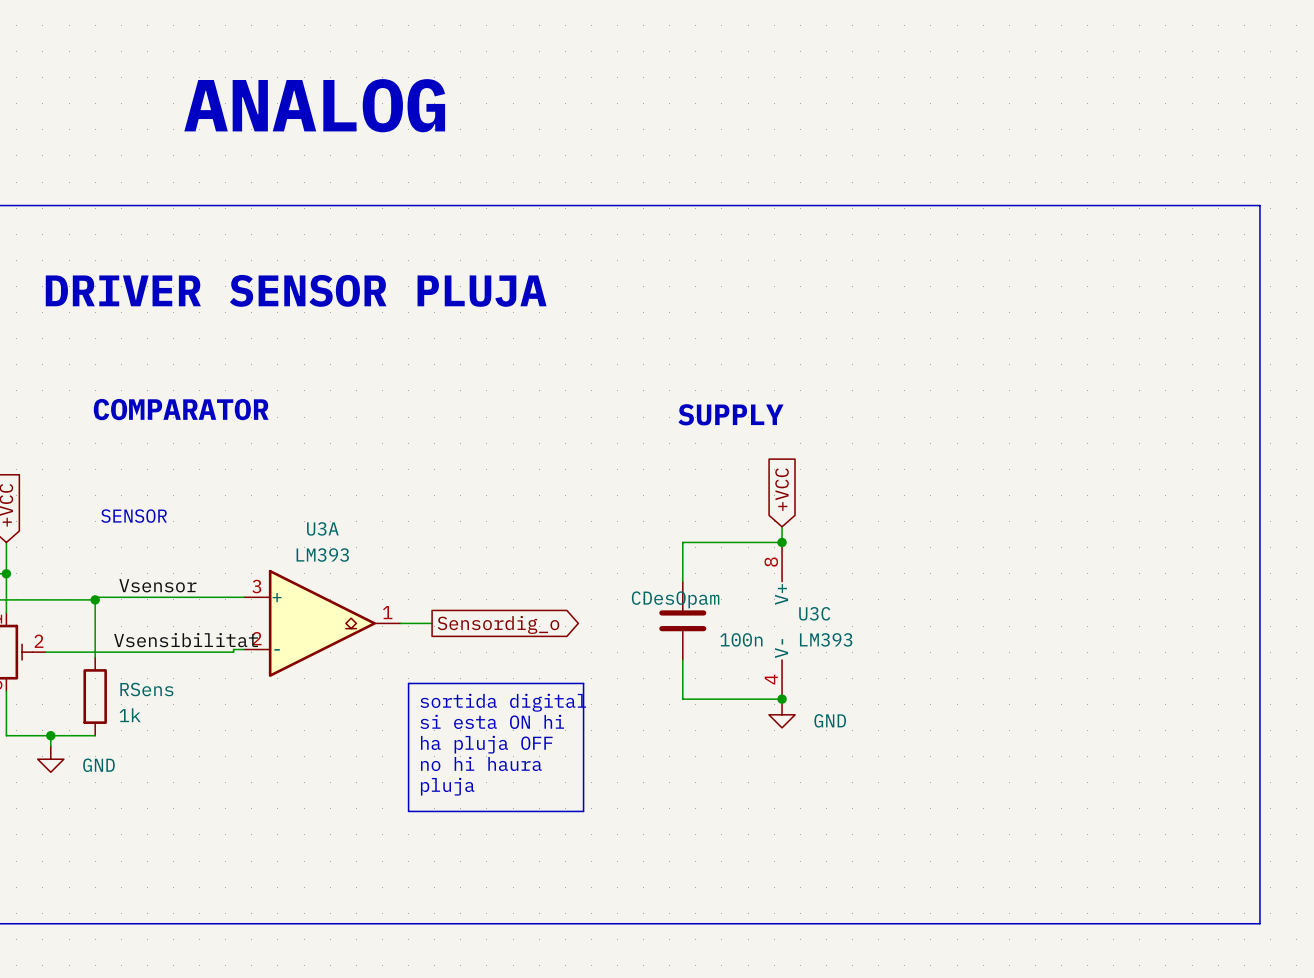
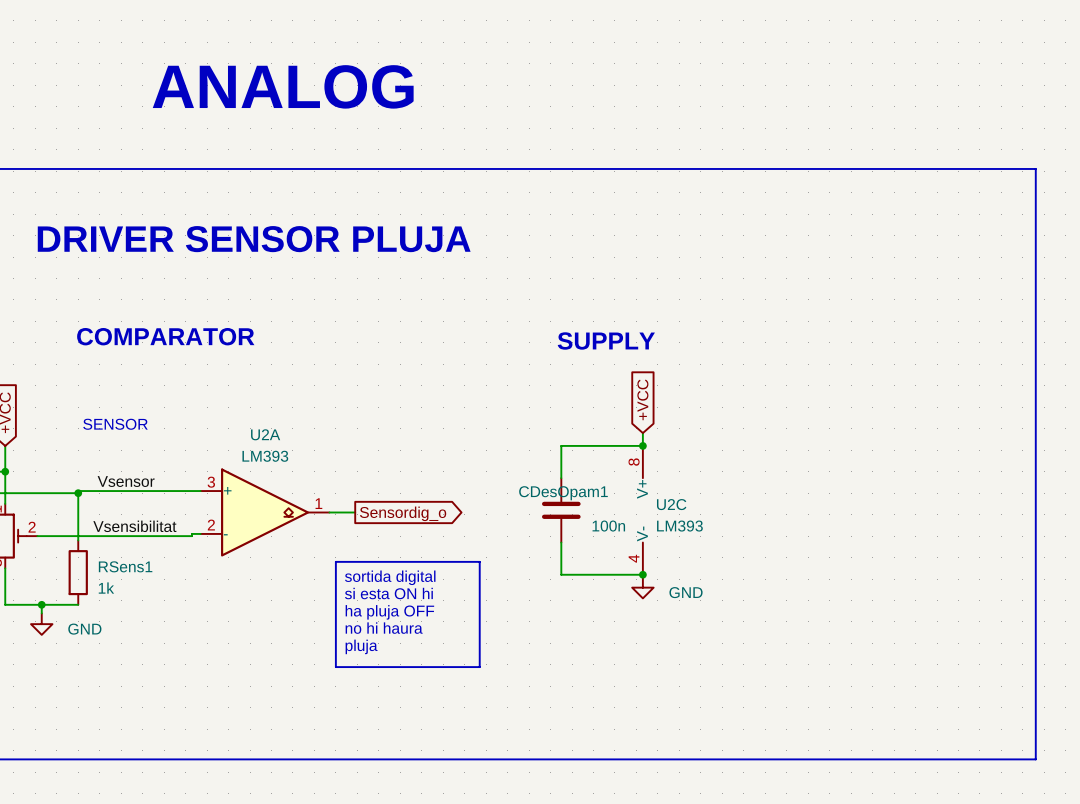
U3A name: U3A (322, 528) -> U2A (265, 434)
CDesOpam name: CDesOpam (675, 599) -> CDesOpam1 (563, 493)
U3C name: U3C (814, 613) -> U2C (671, 504)
RSens name: RSens (146, 689) -> RSens1 (125, 566)

